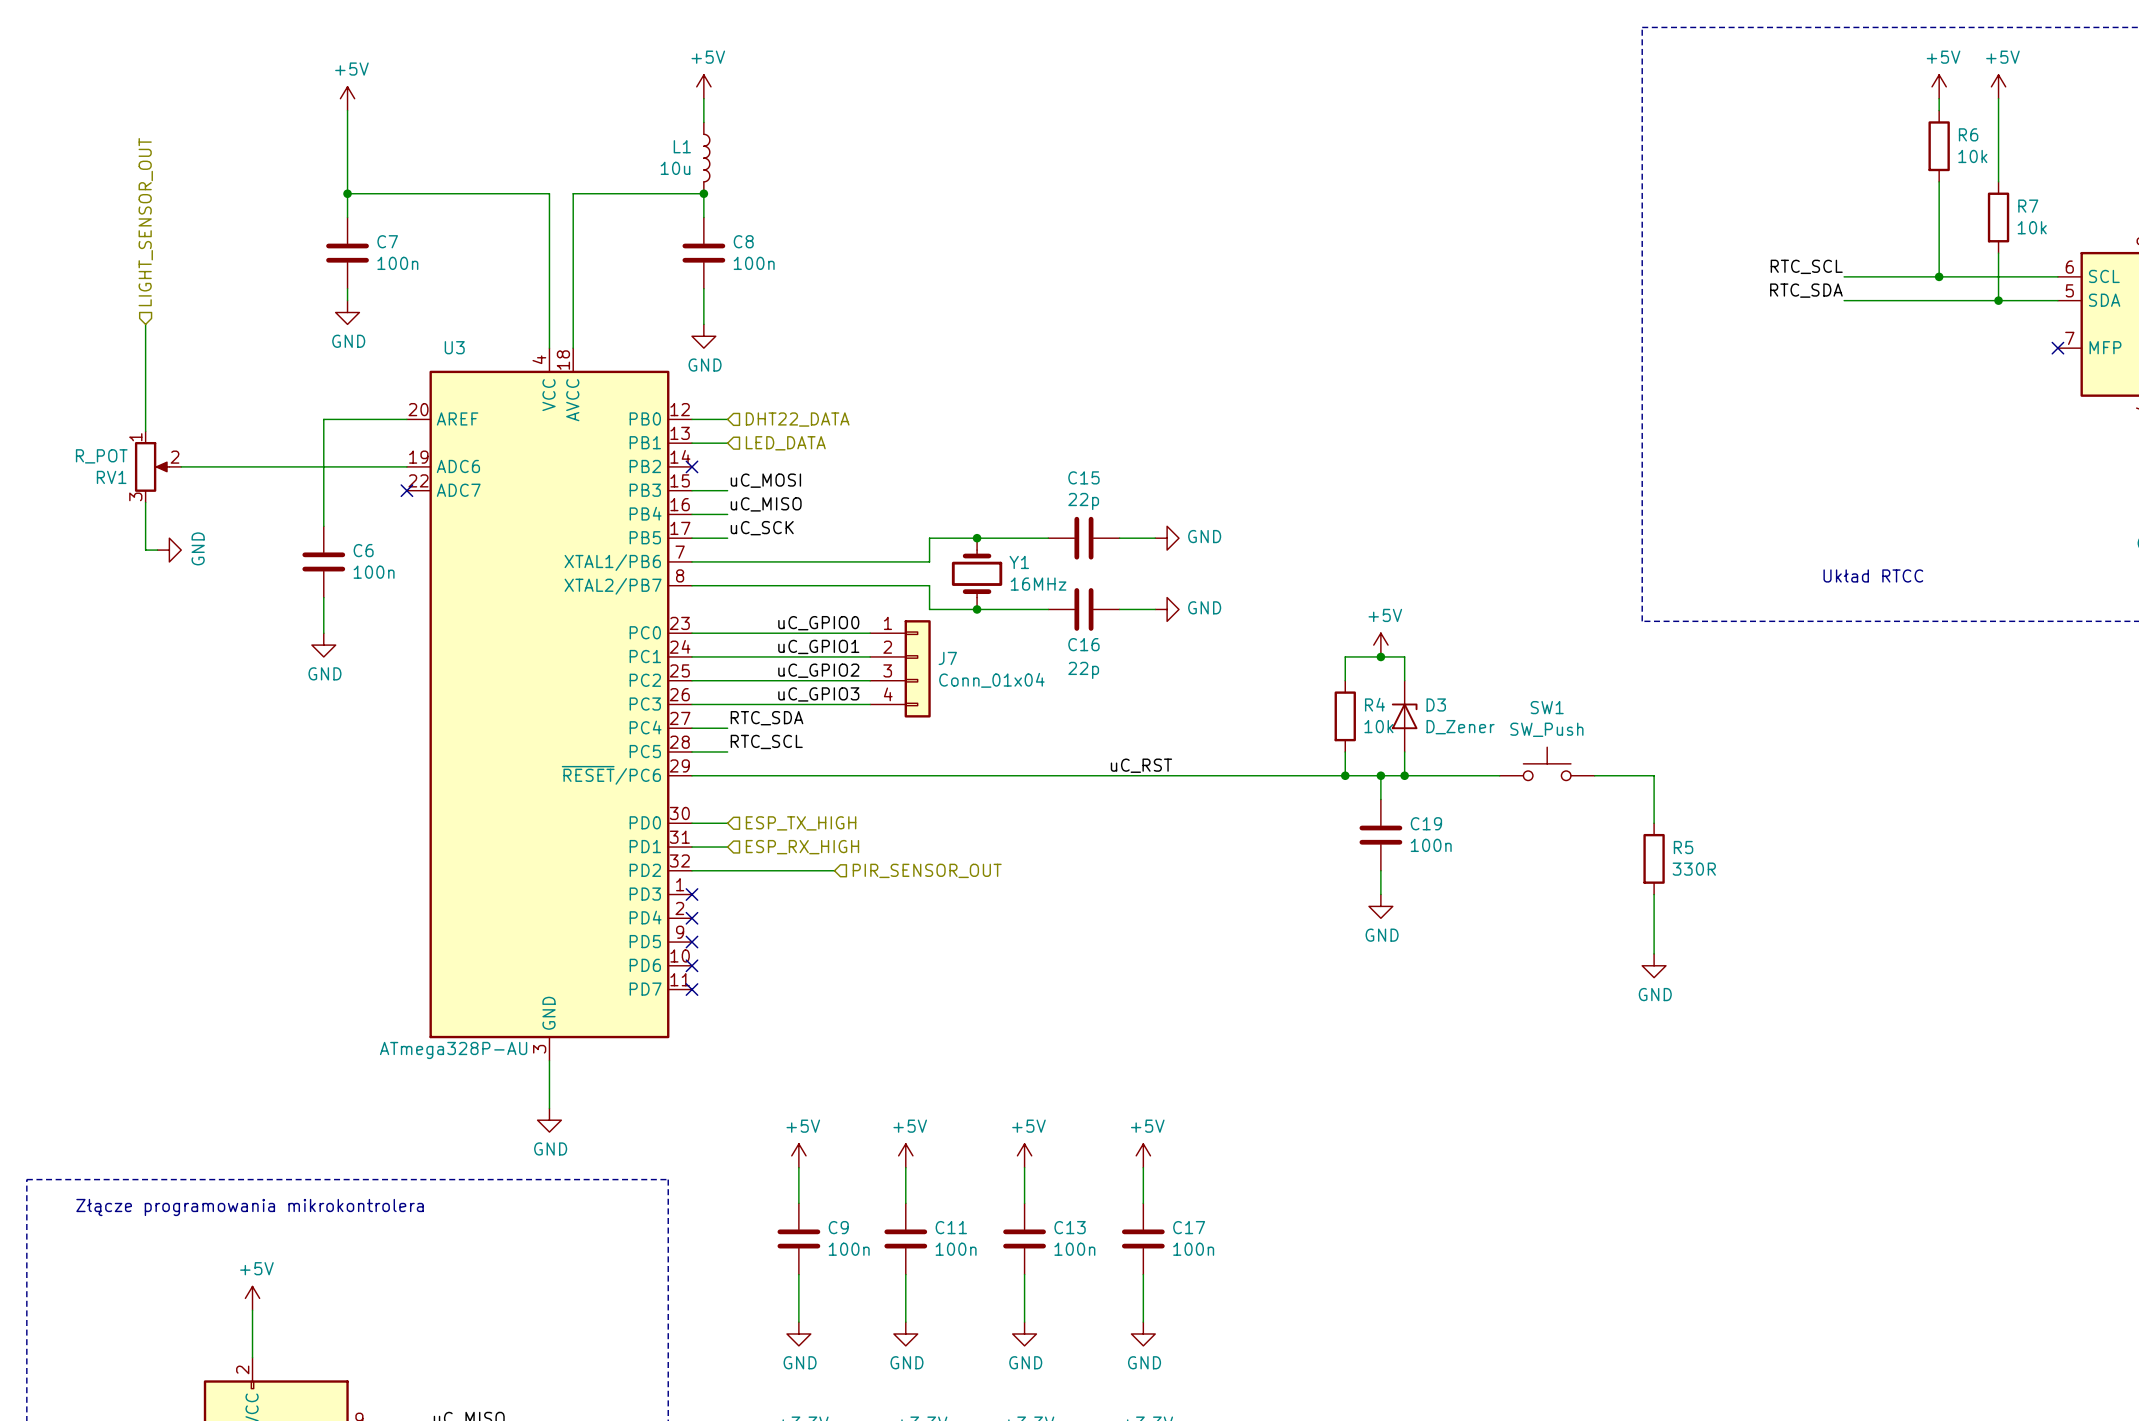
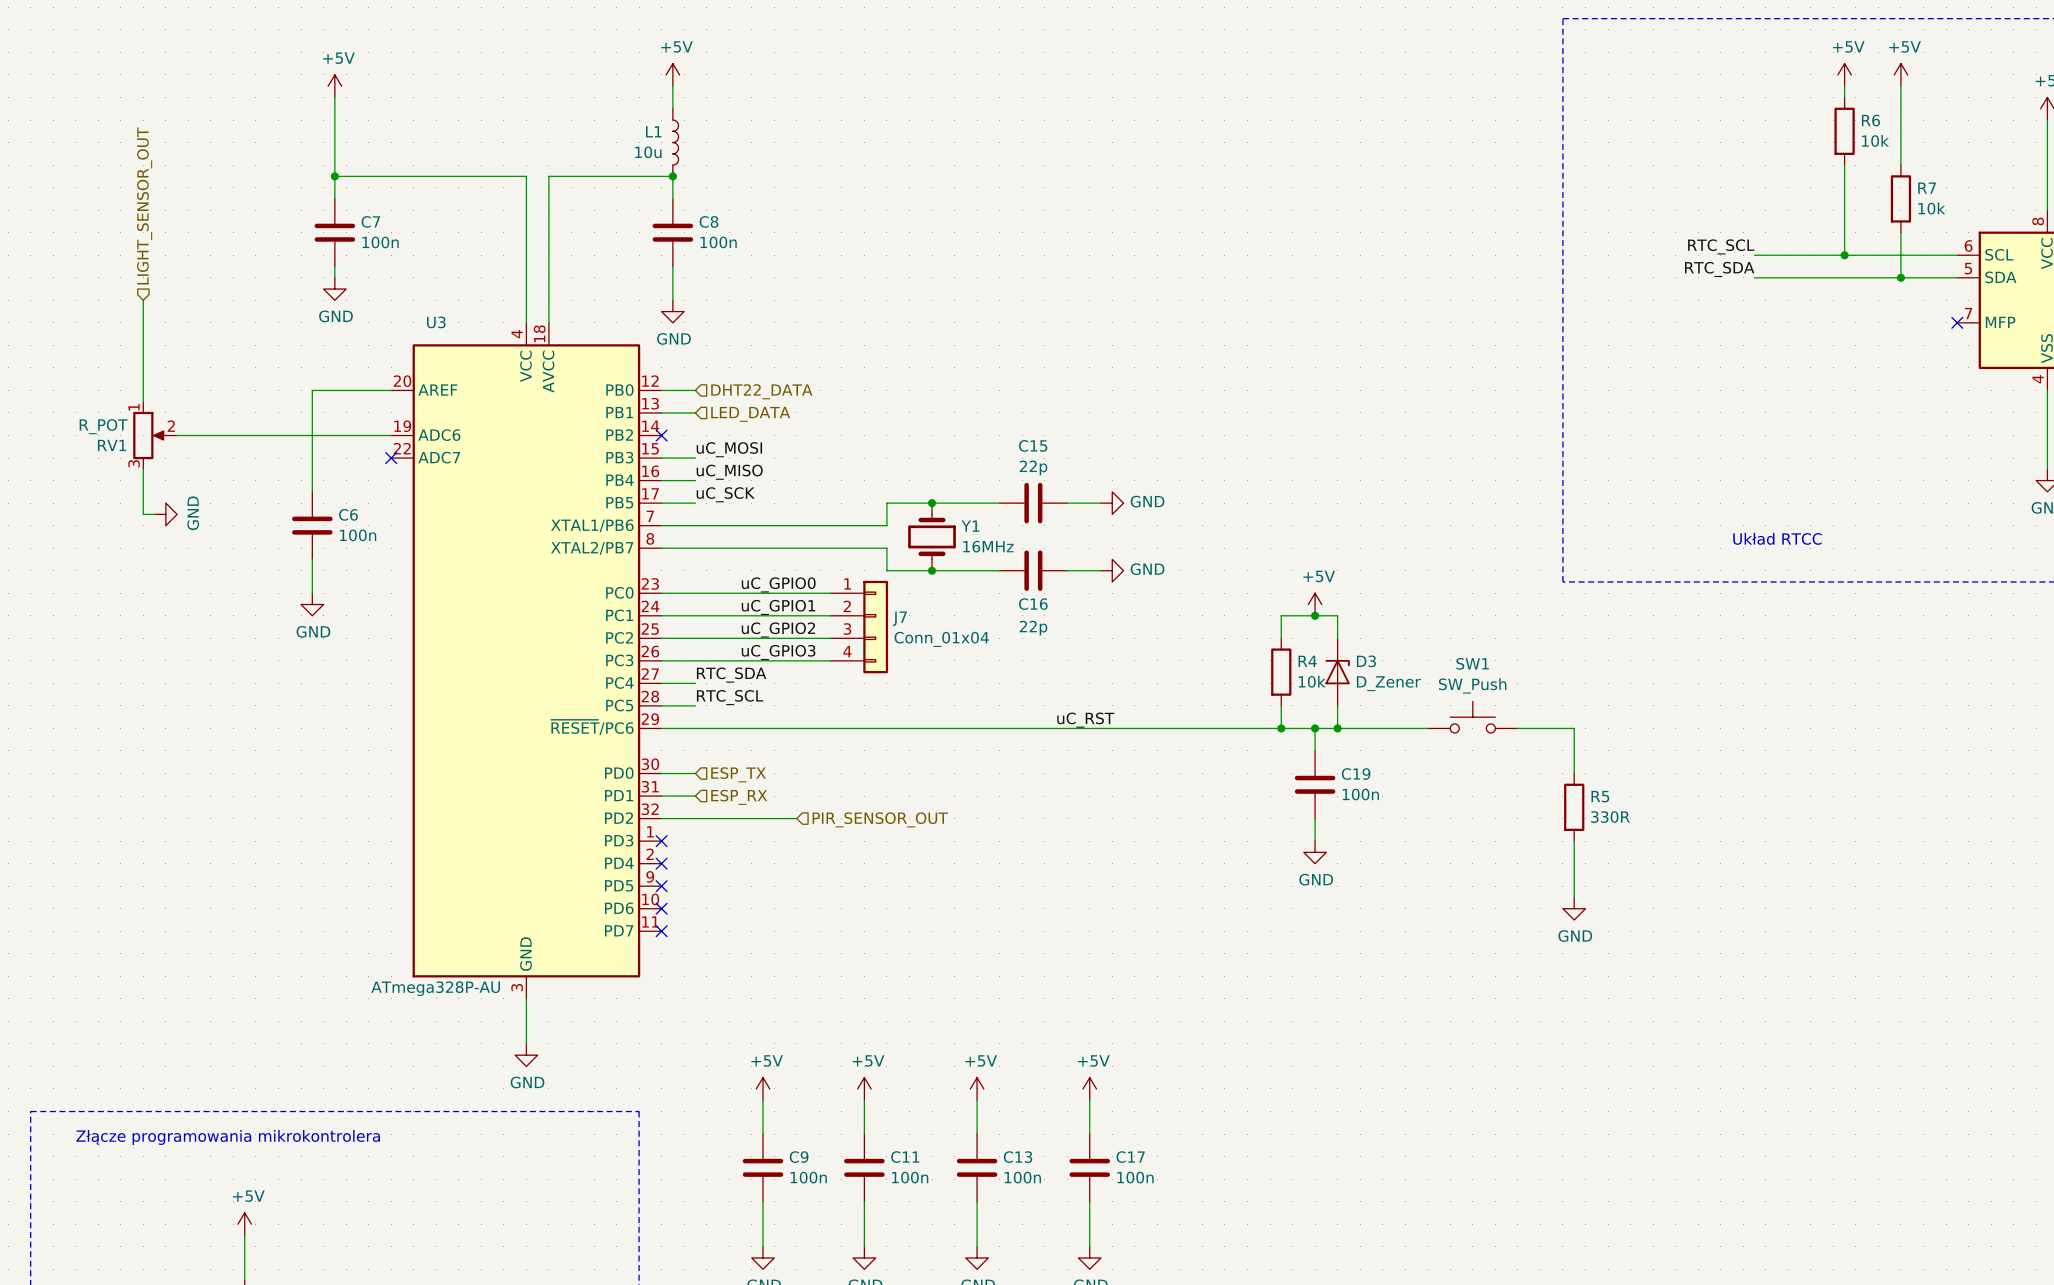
hierarchical label: ESP_TX_HIGH (801, 823) -> ESP_TX (738, 774)
hierarchical label: ESP_RX_HIGH (802, 847) -> ESP_RX (739, 797)

